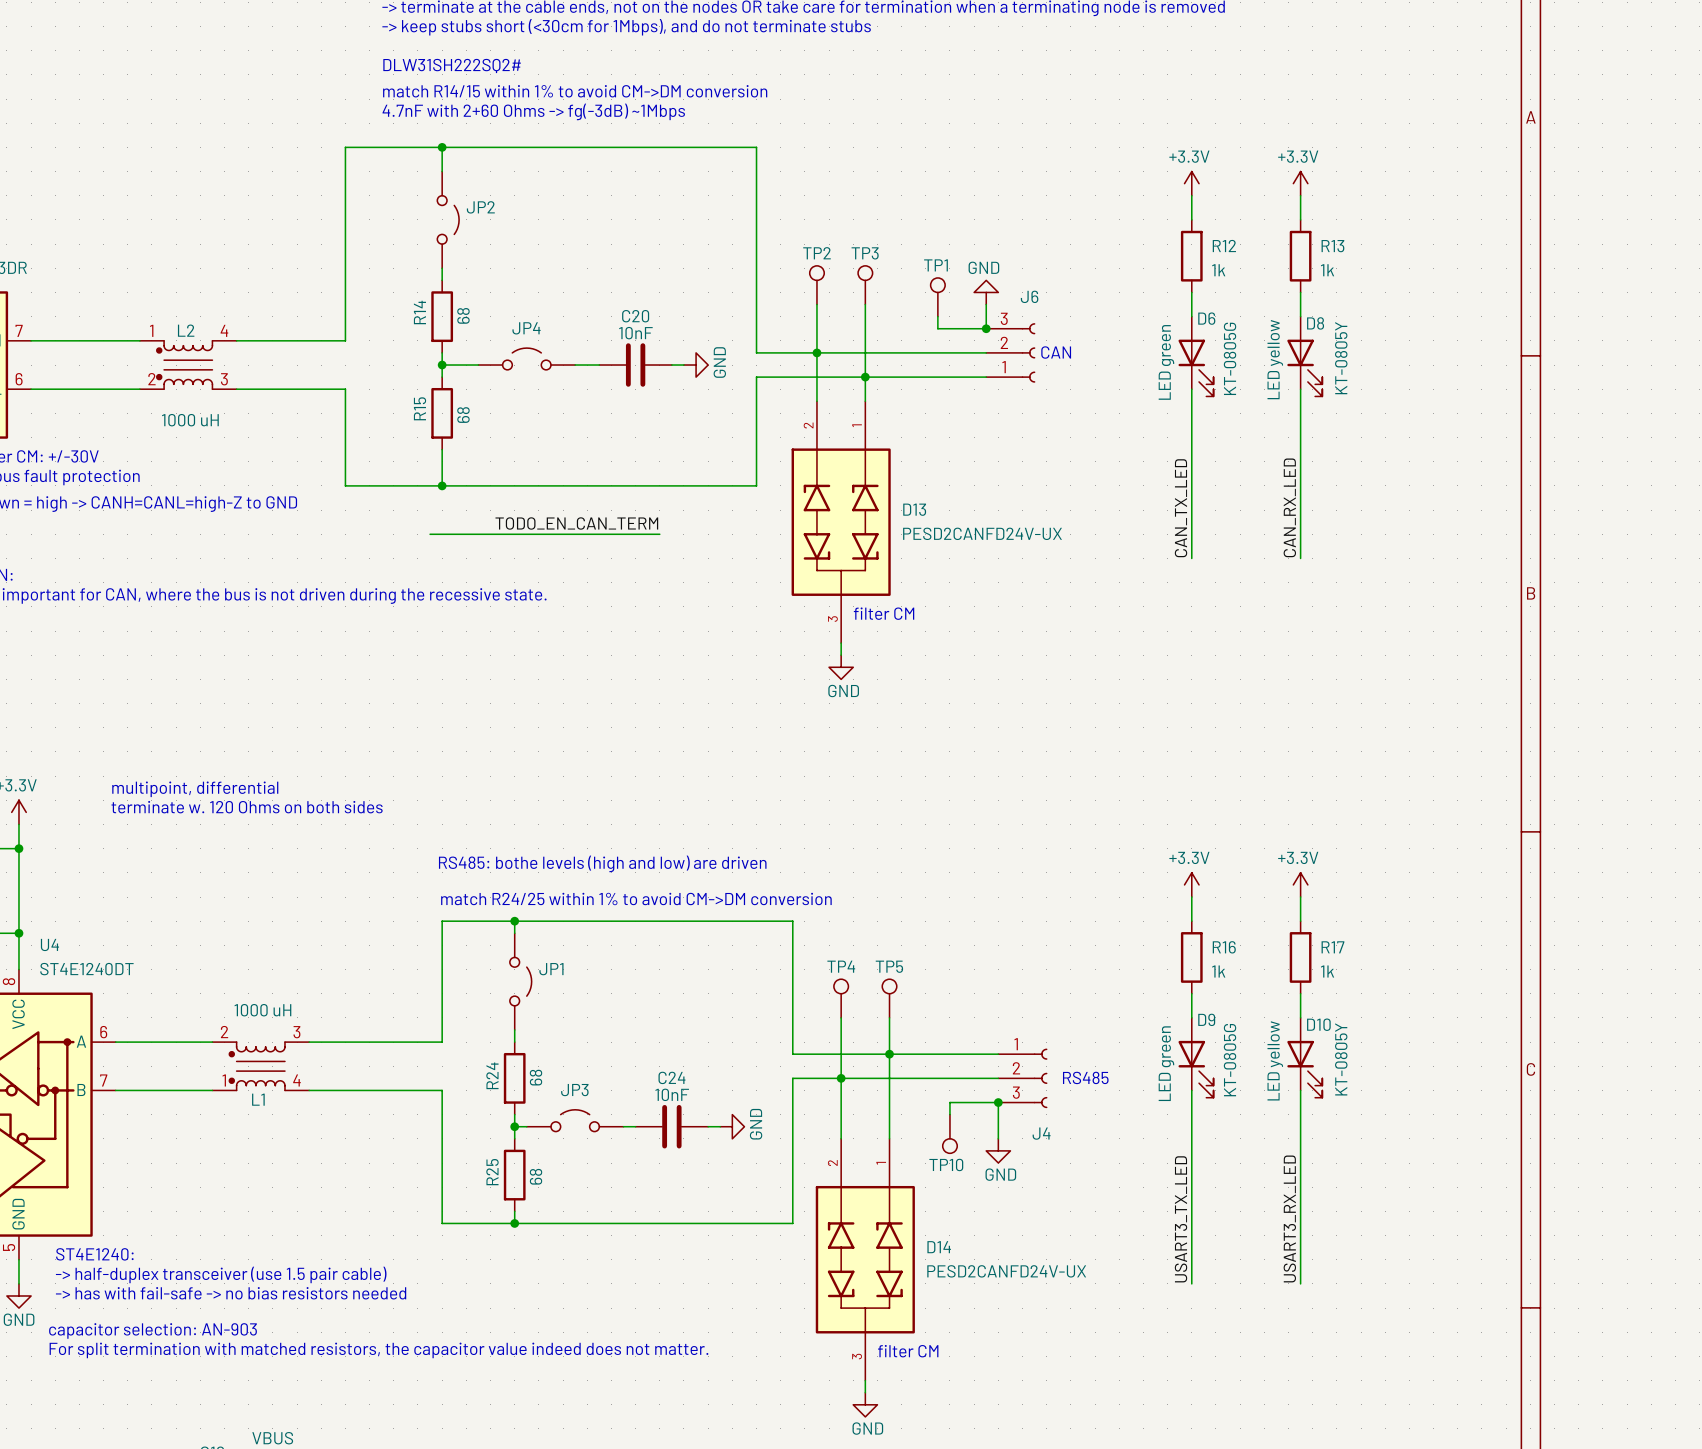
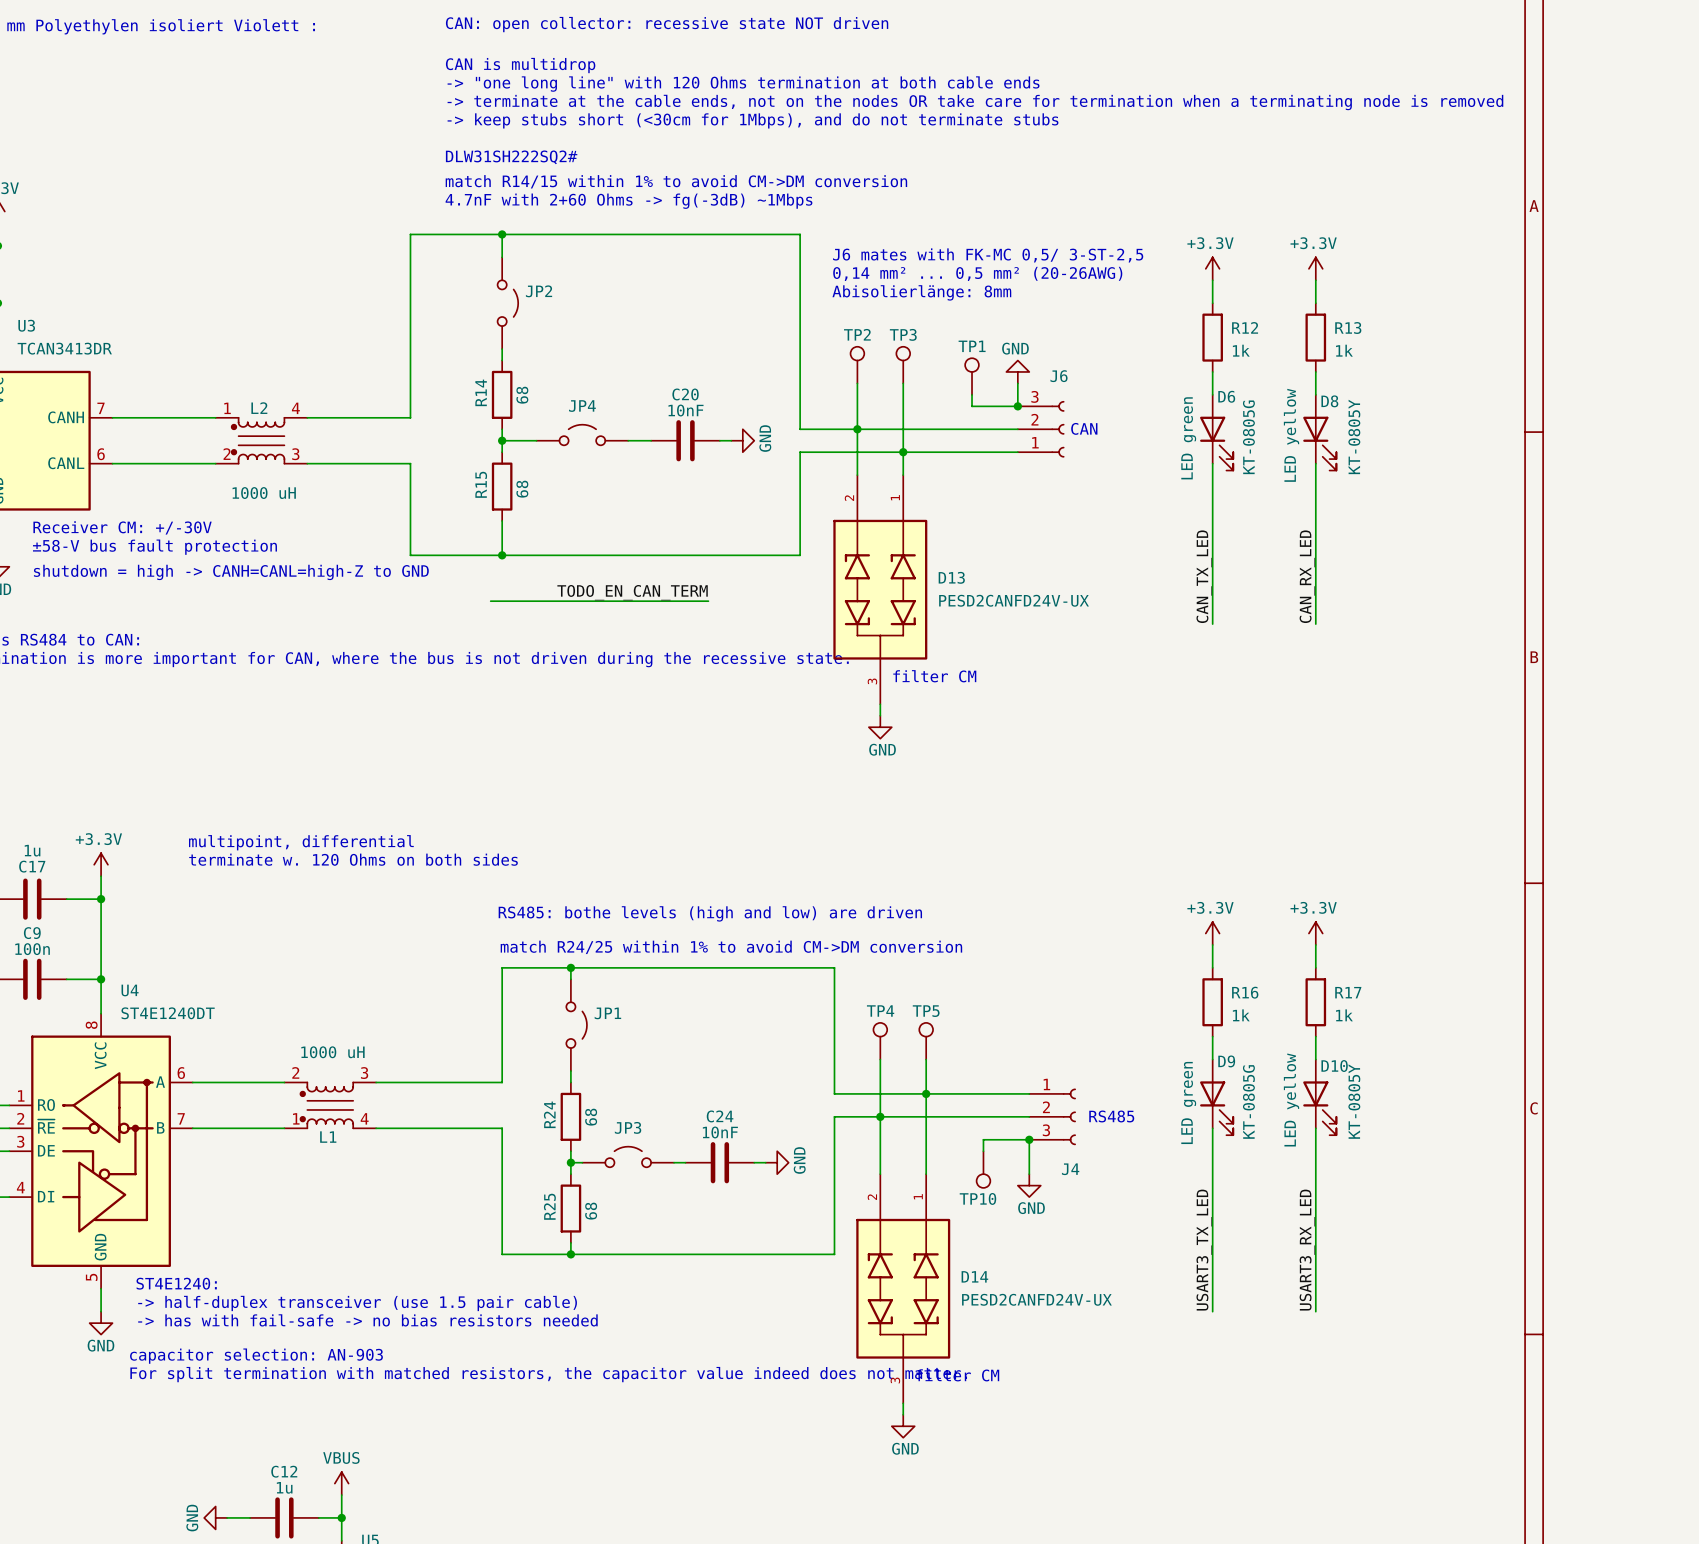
text: none -> J6 mates with FK-MC 0,5/ 3-ST-2,5 (988, 255)
text: none -> 0,14 mm² ... 0,5 mm² (20-26AWG) (977, 273)
text: none -> Abisolierlänge: 8mm (921, 292)

